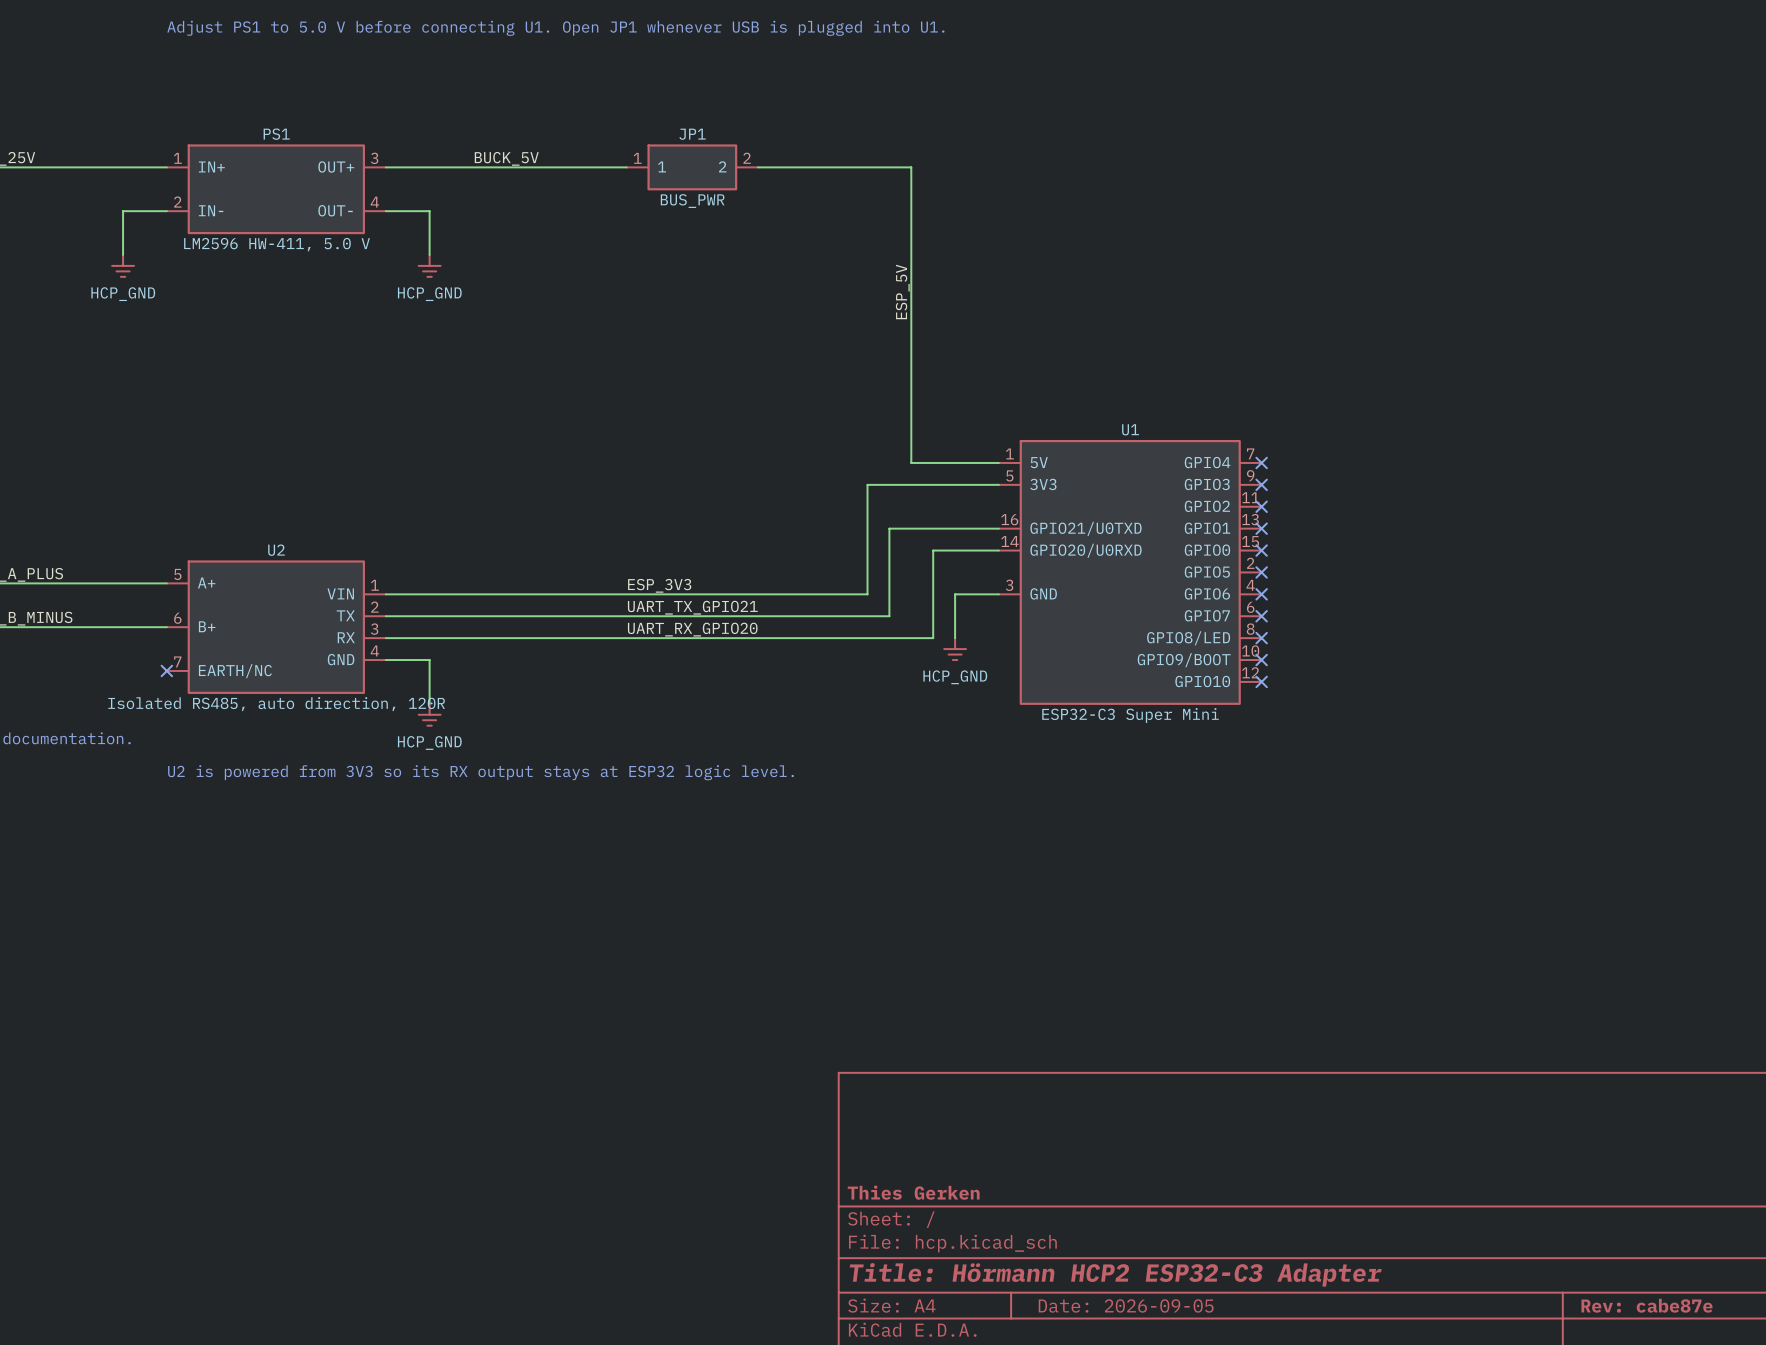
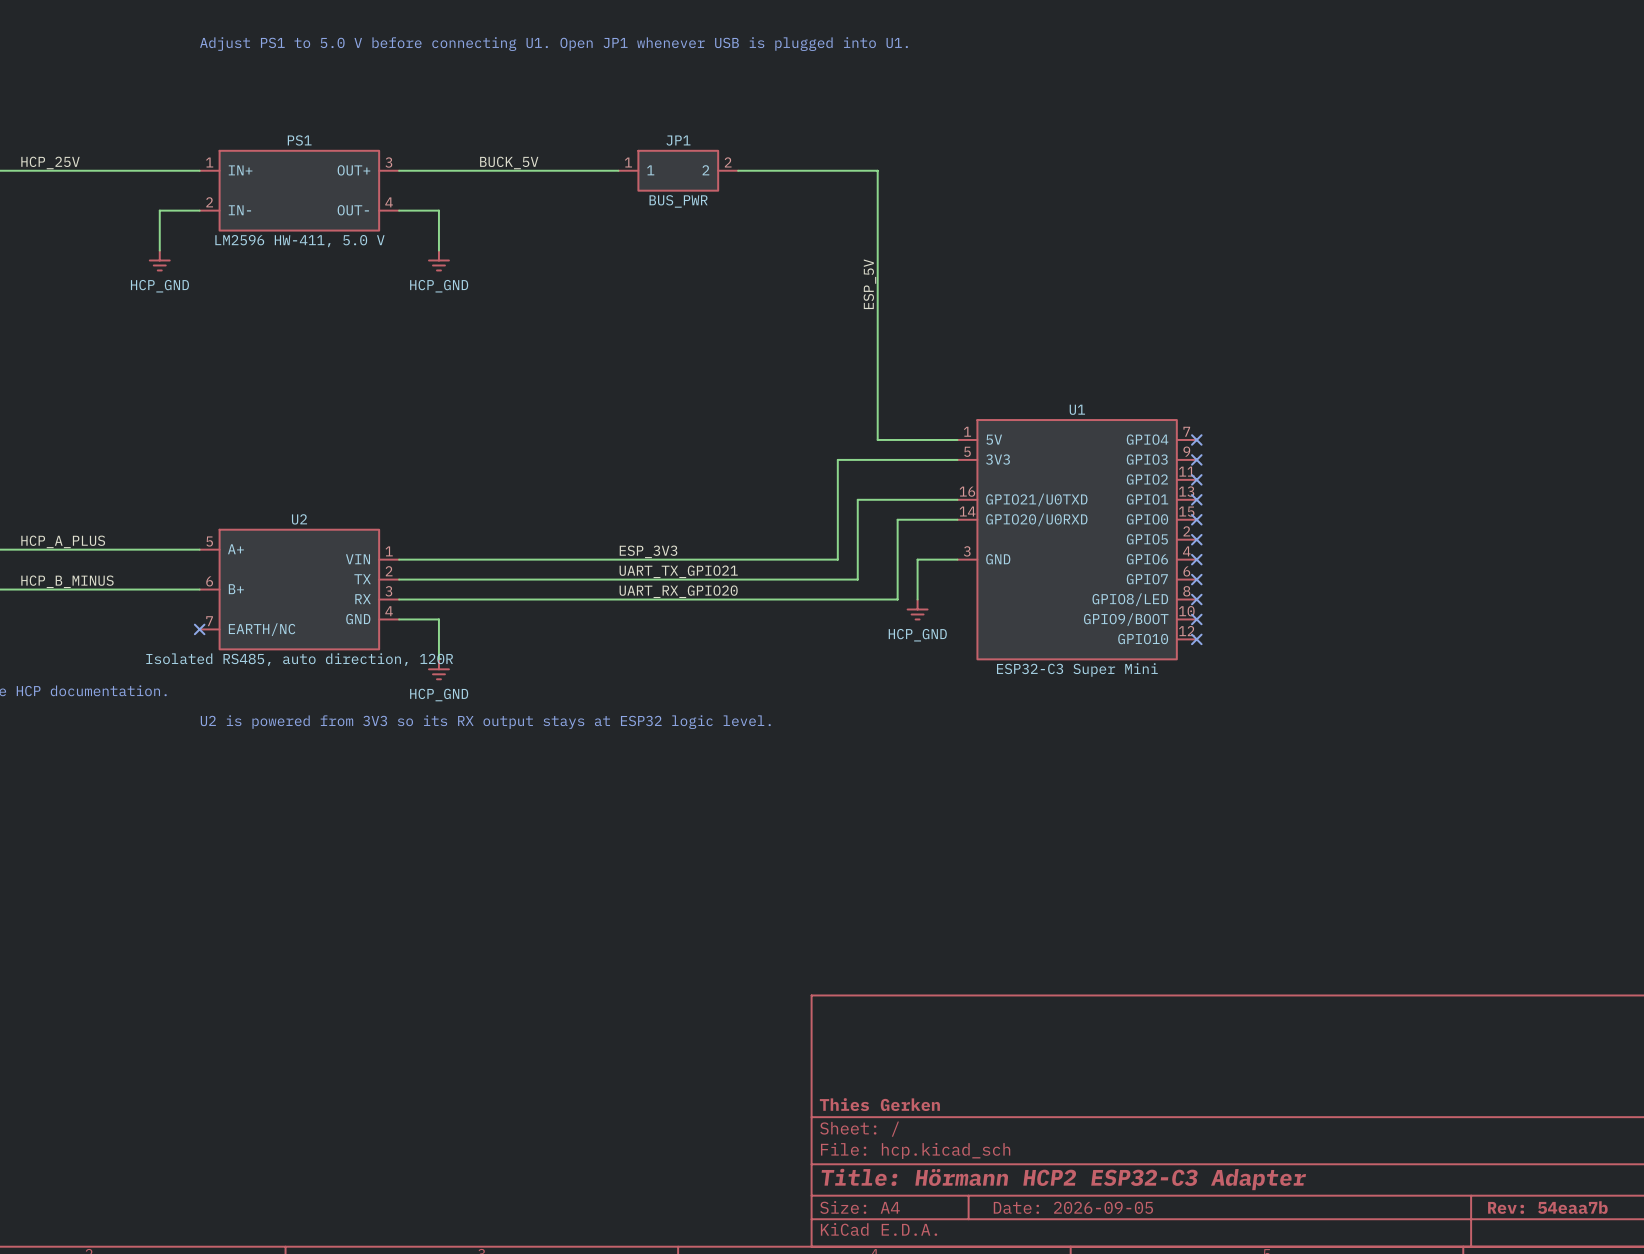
title block: Rev: cabe87e (1646, 1305) -> Rev: 54eaa7b (1547, 1207)

